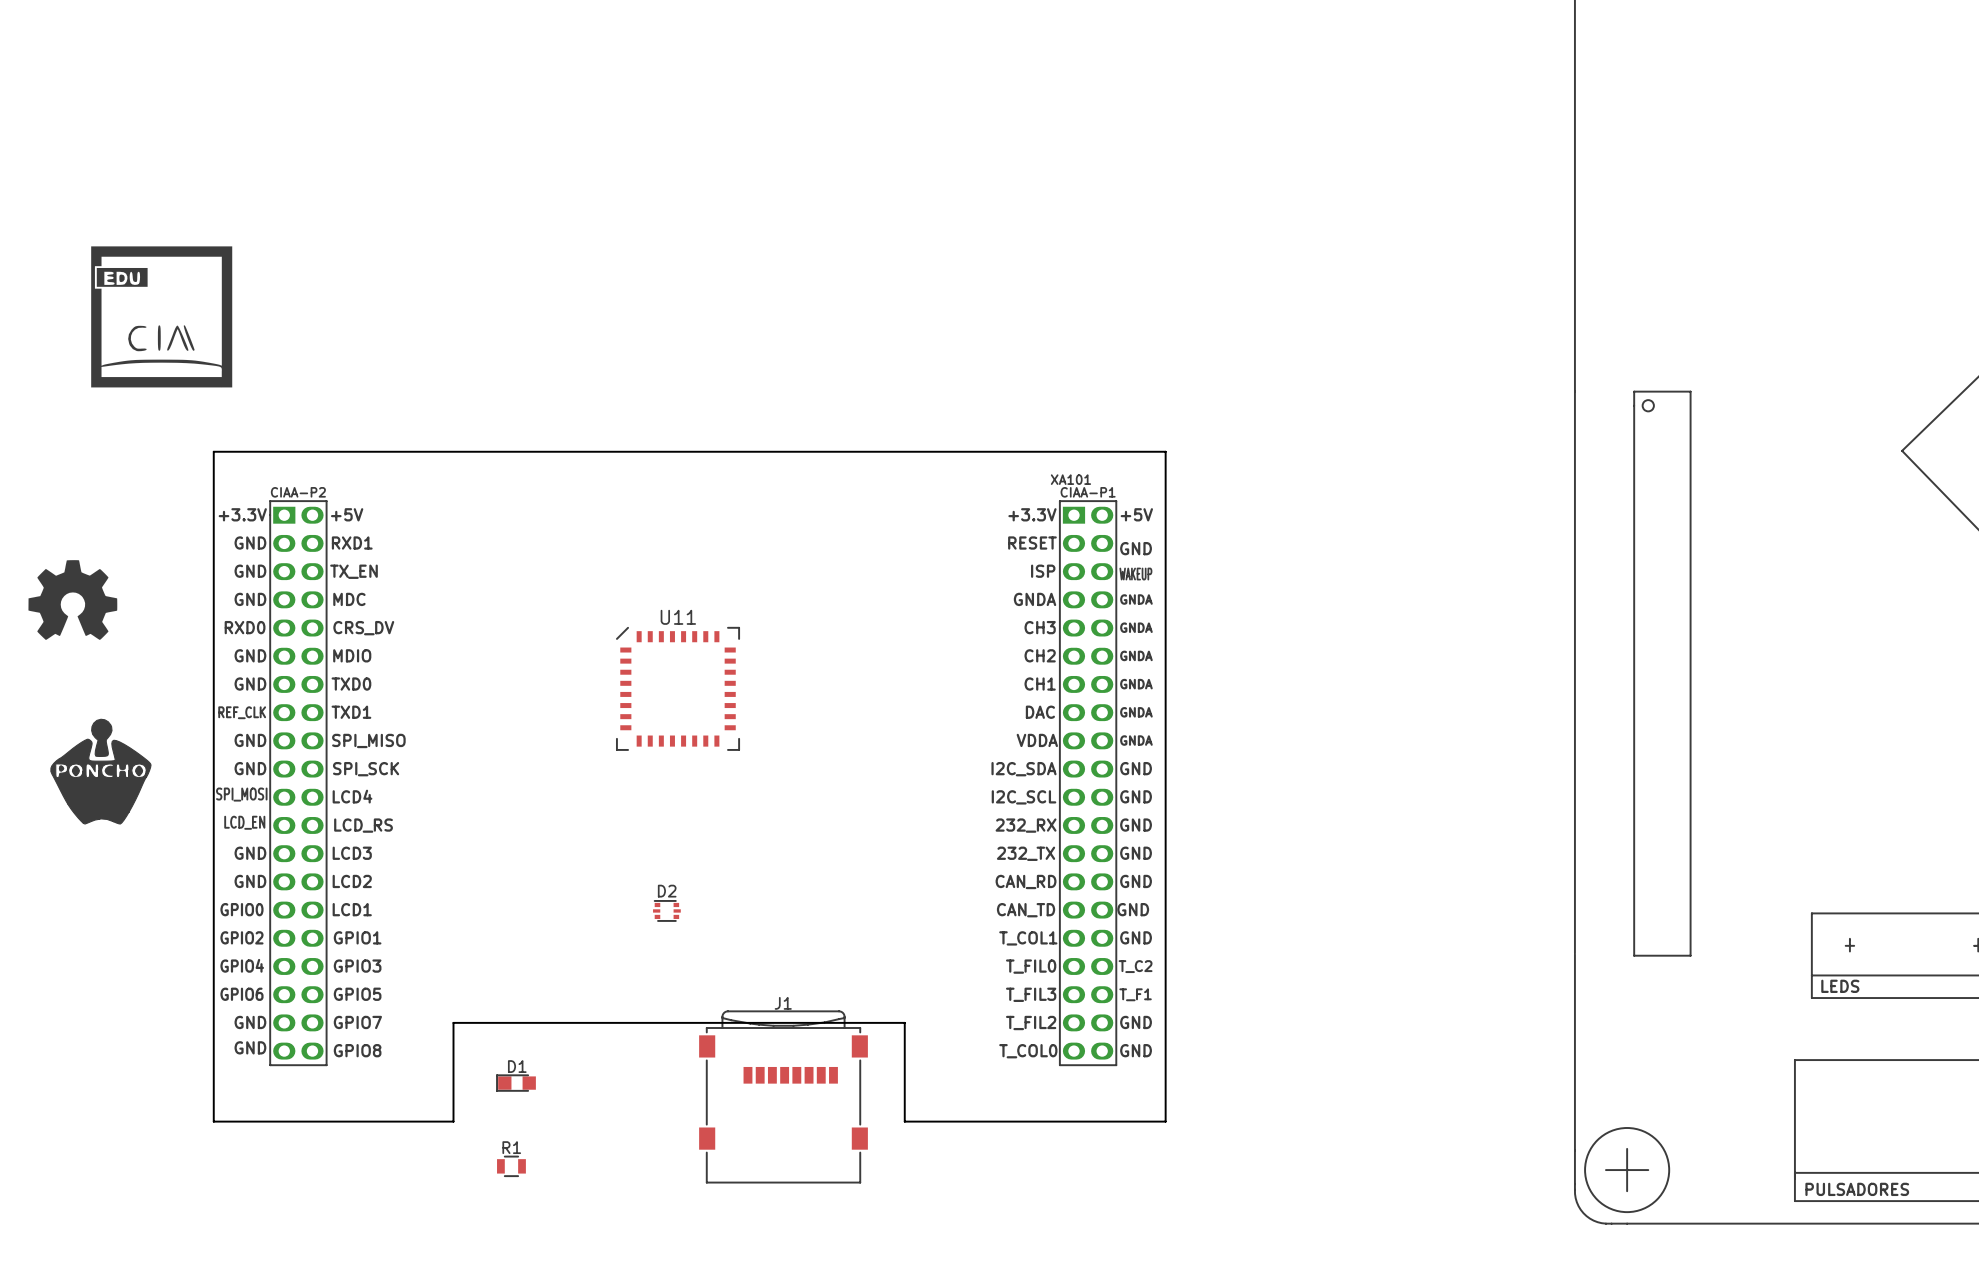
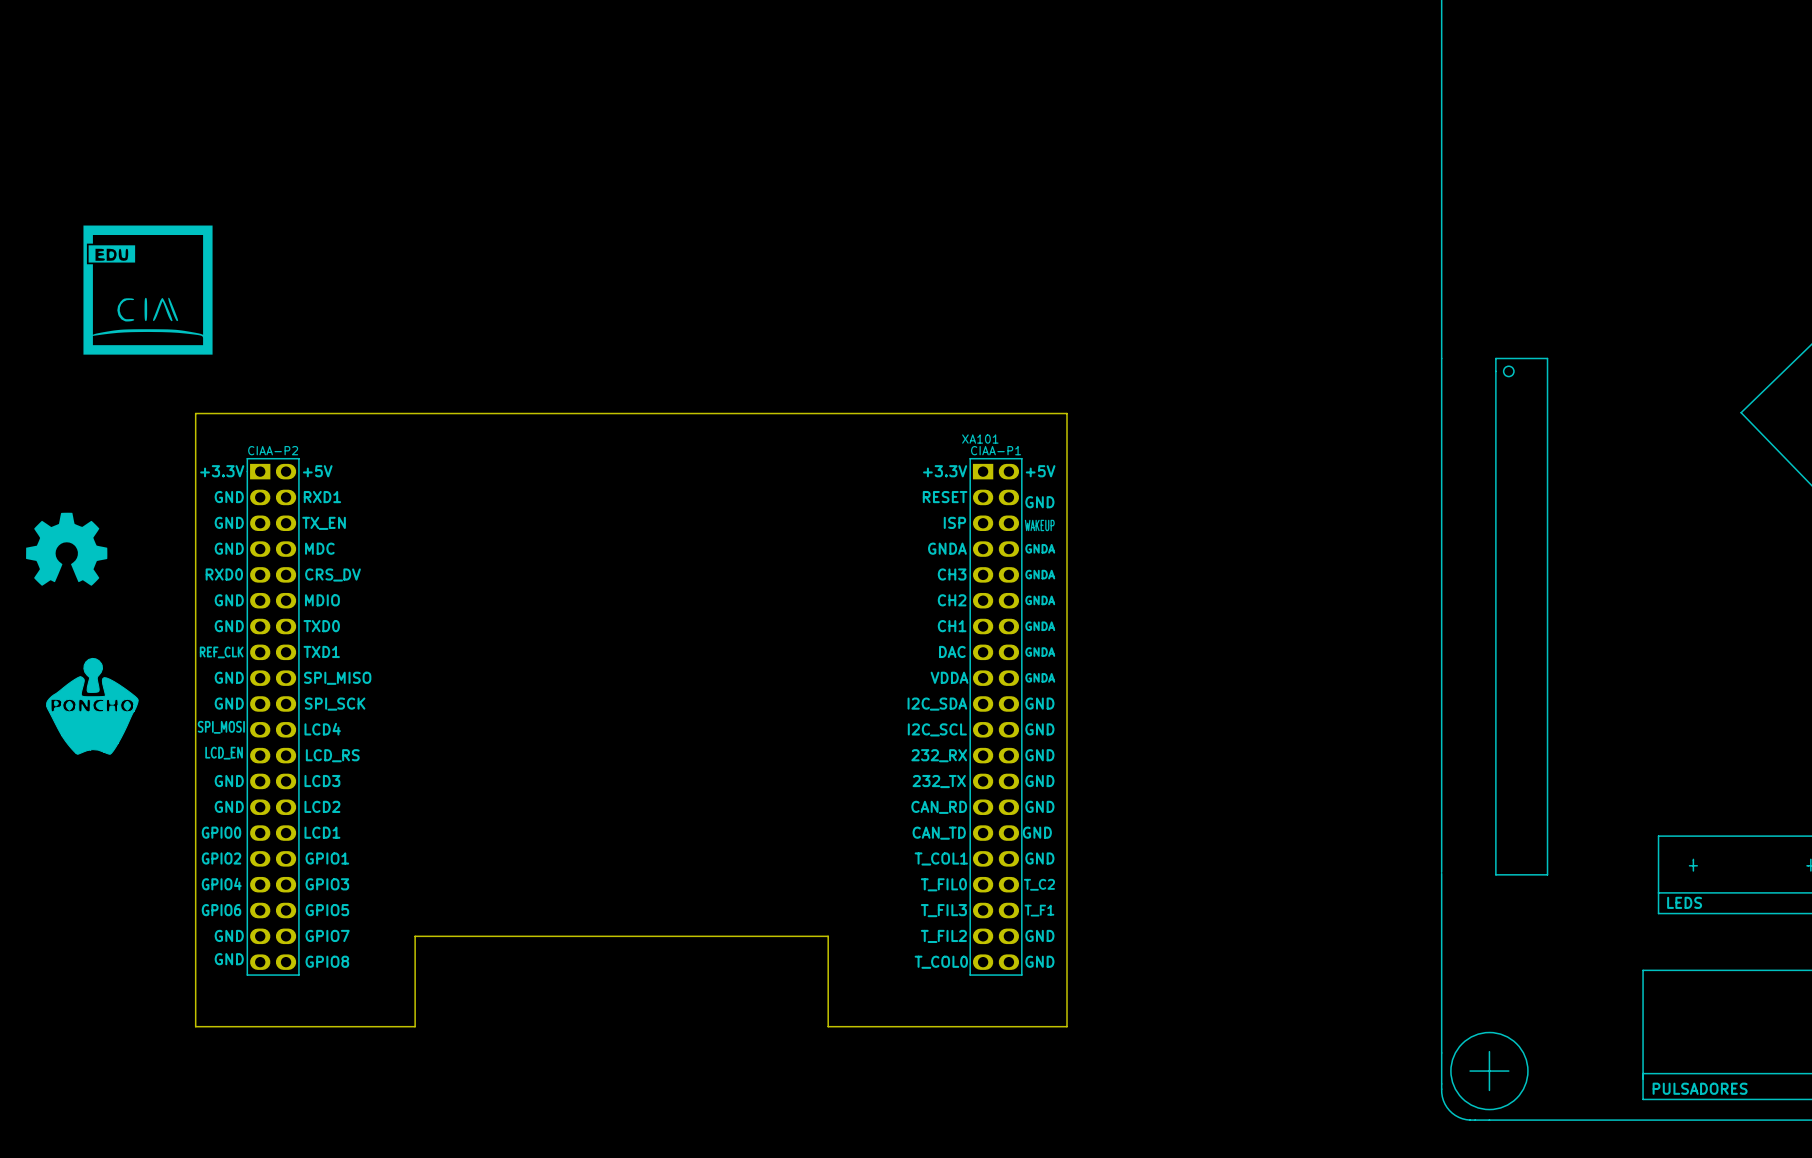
U11: (678, 688) -> none
D2: (666, 910) -> none
D1: (516, 1083) -> none
J1: (783, 1096) -> none
R1: (511, 1166) -> none

